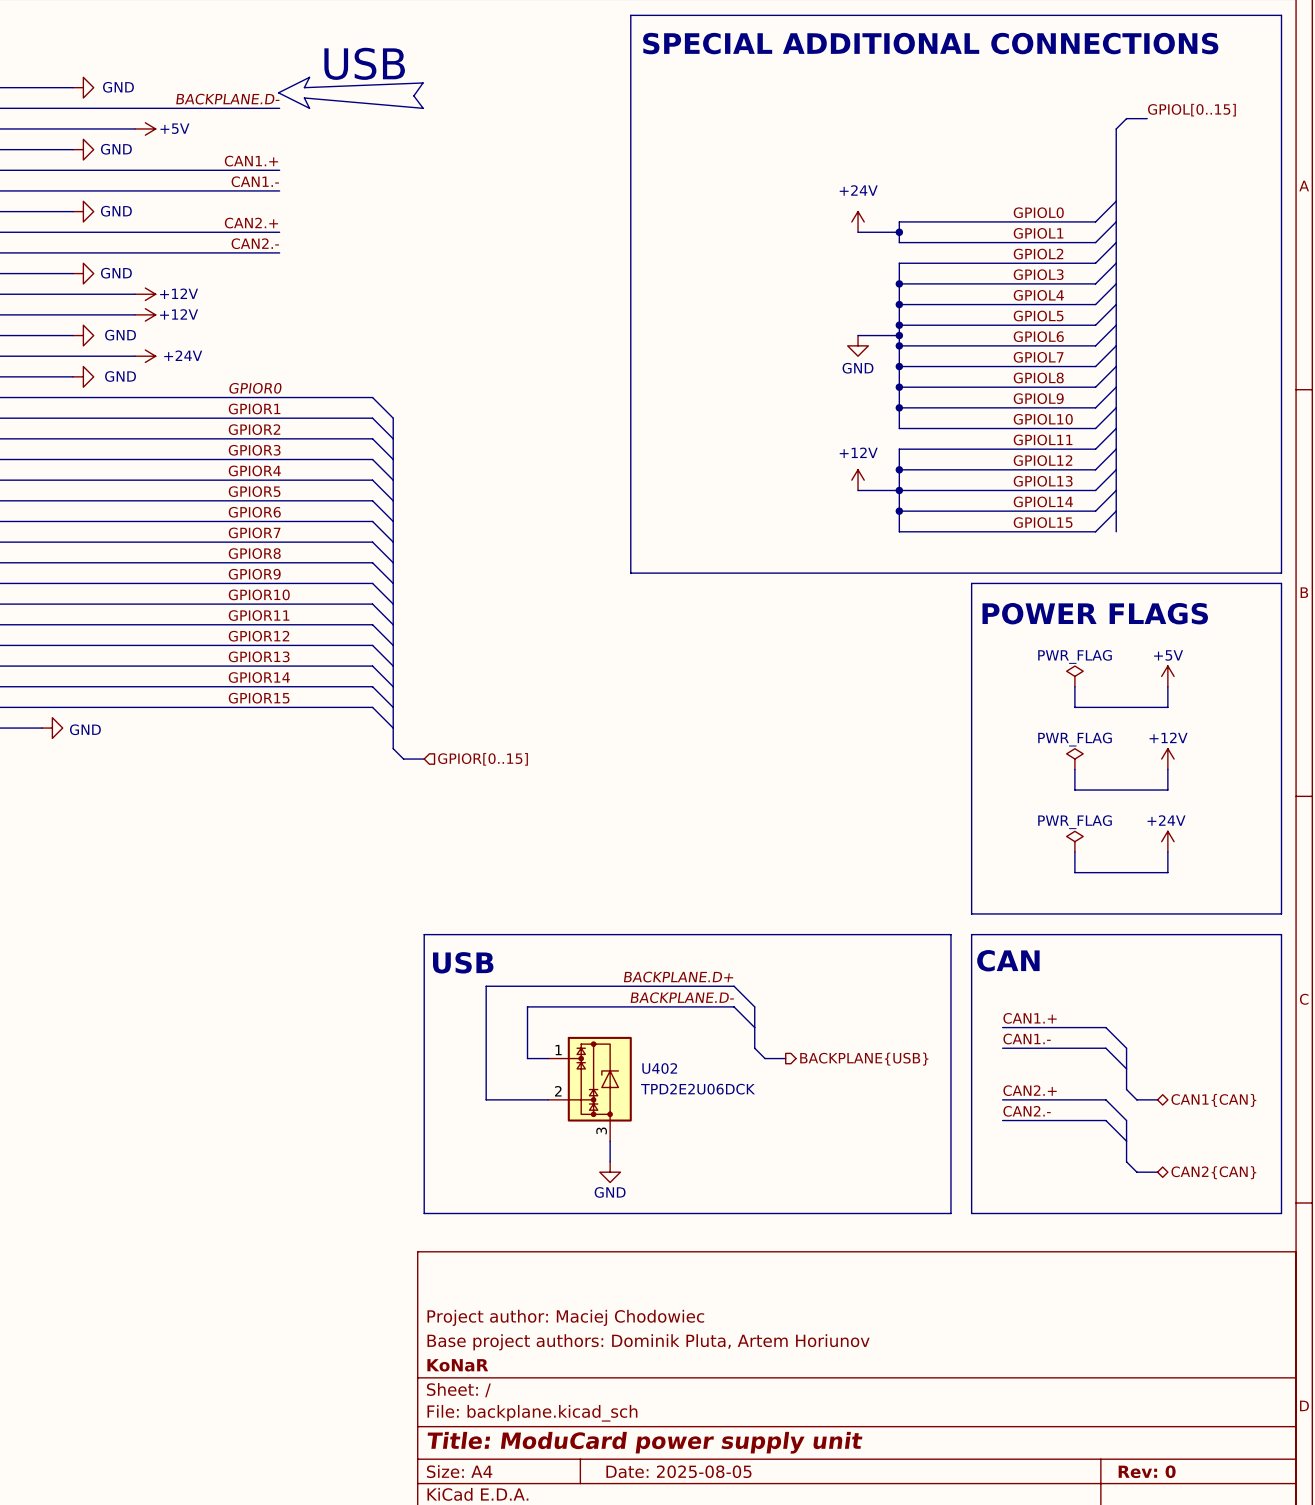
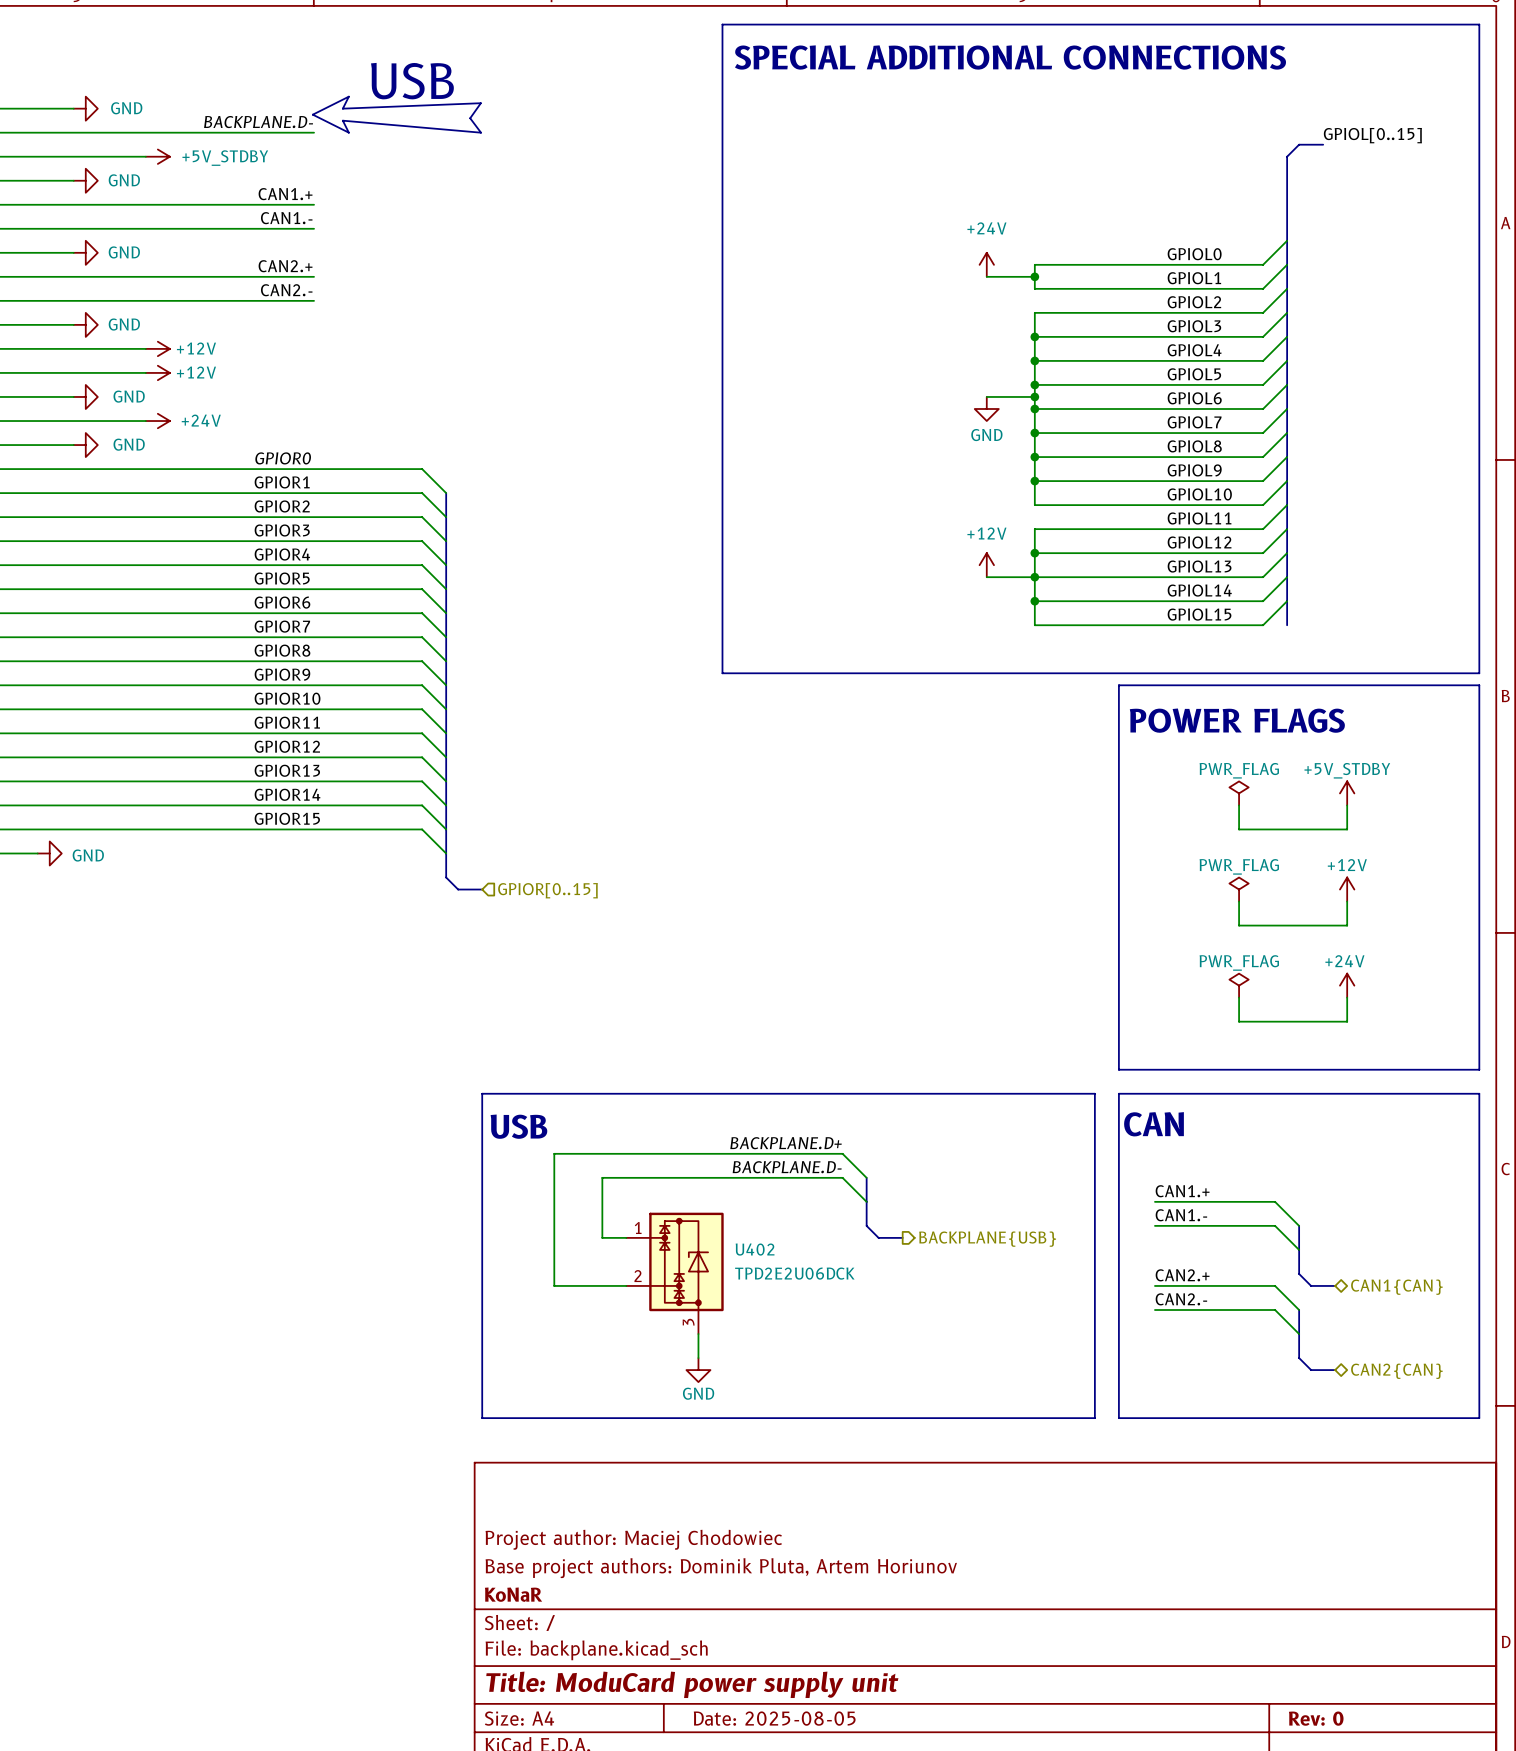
power symbol: +5V (145, 128) -> +5V_STDBY (157, 156)
power symbol: +5V (1167, 676) -> +5V_STDBY (1347, 793)

